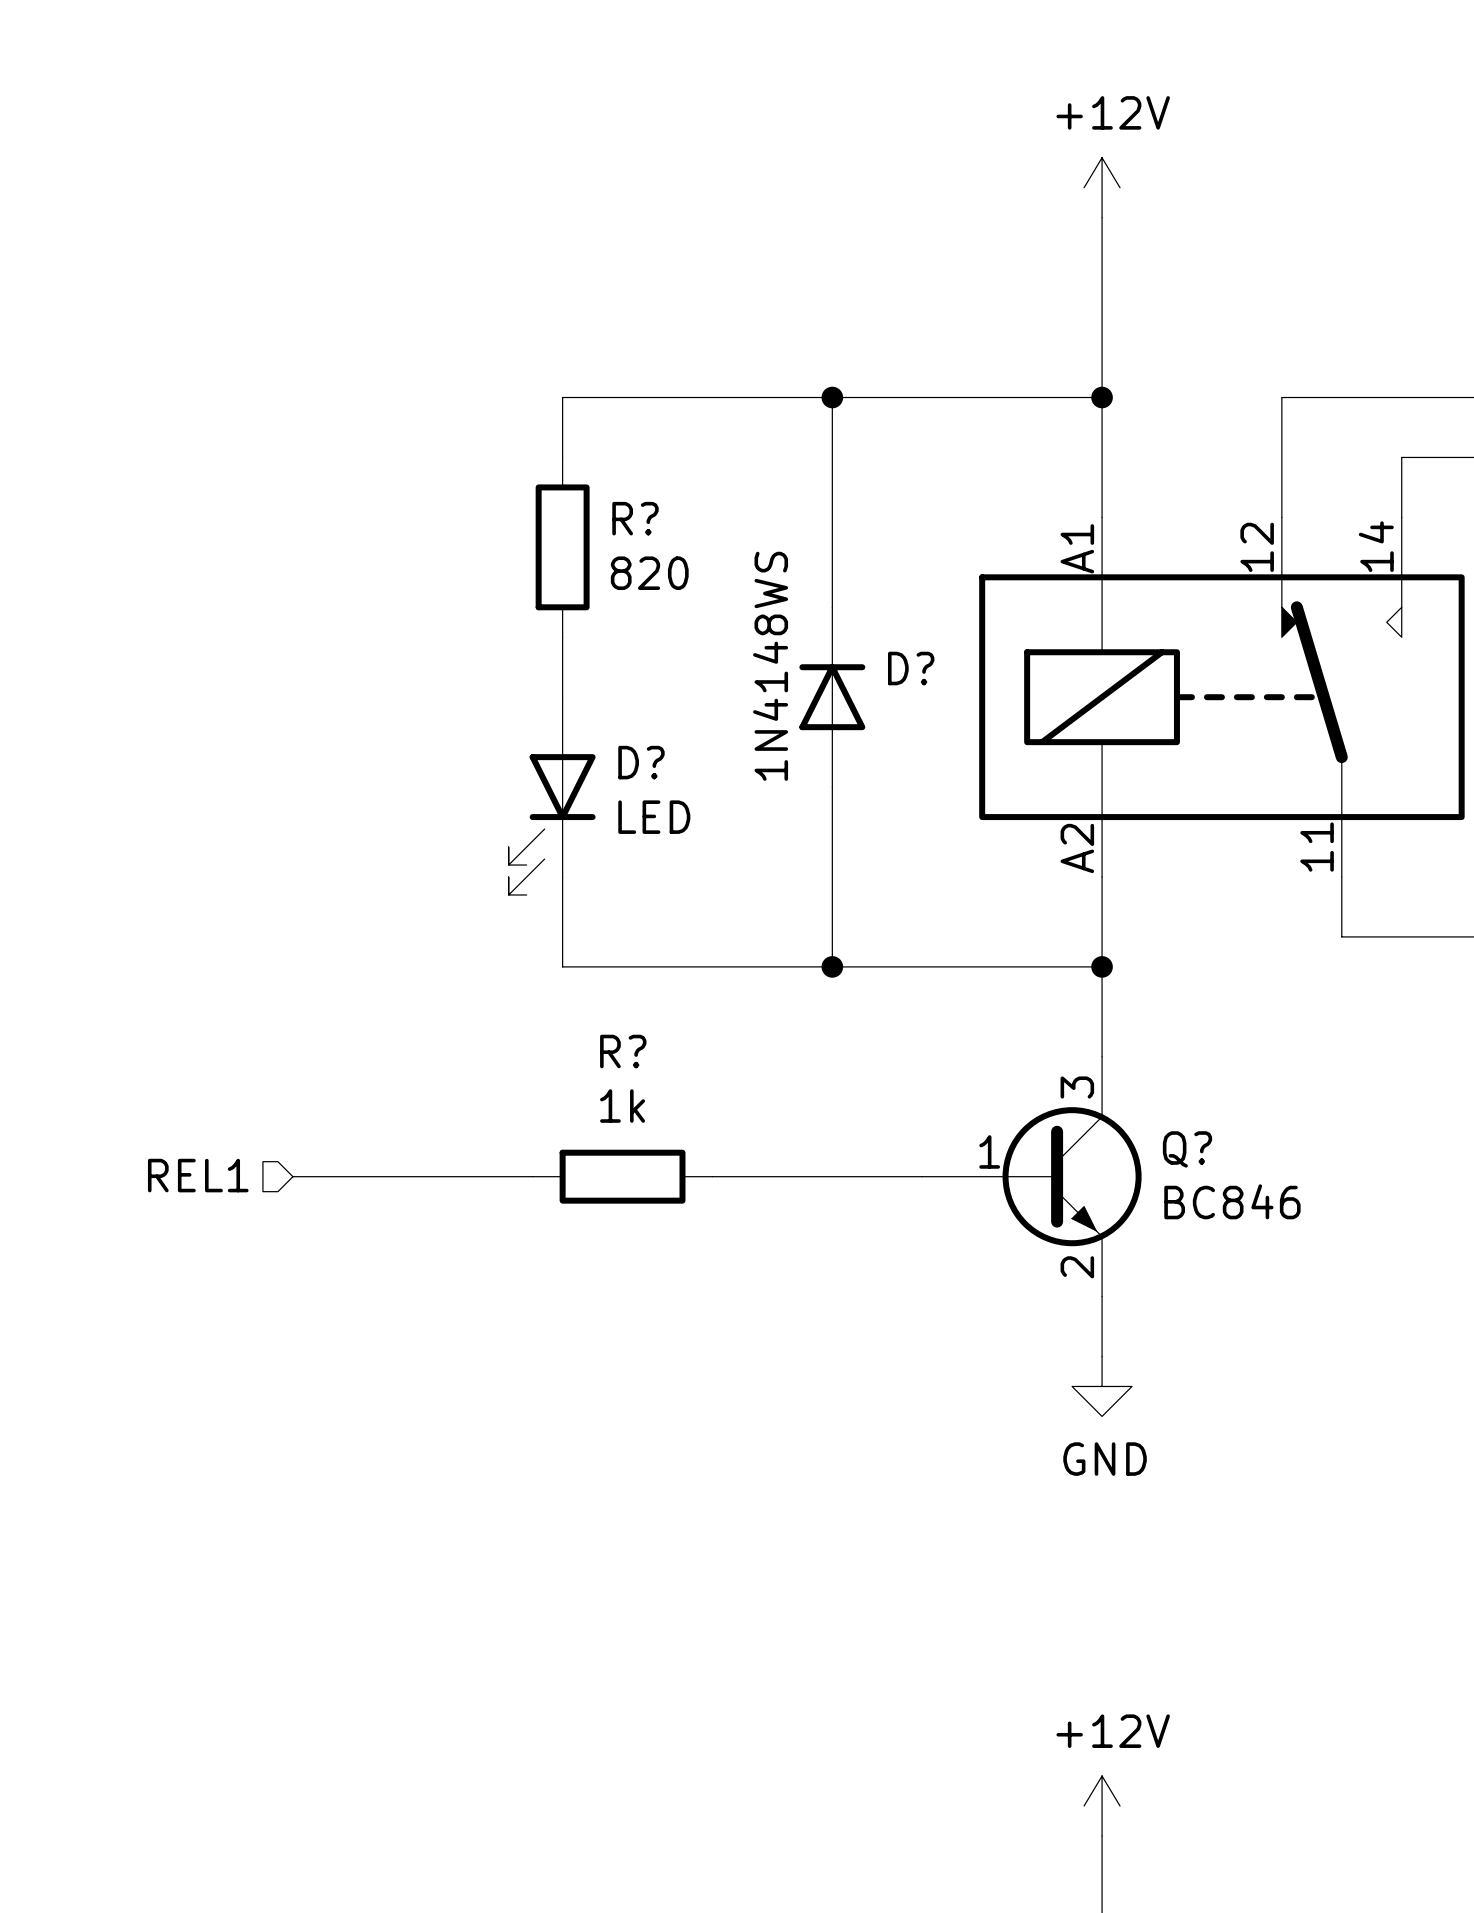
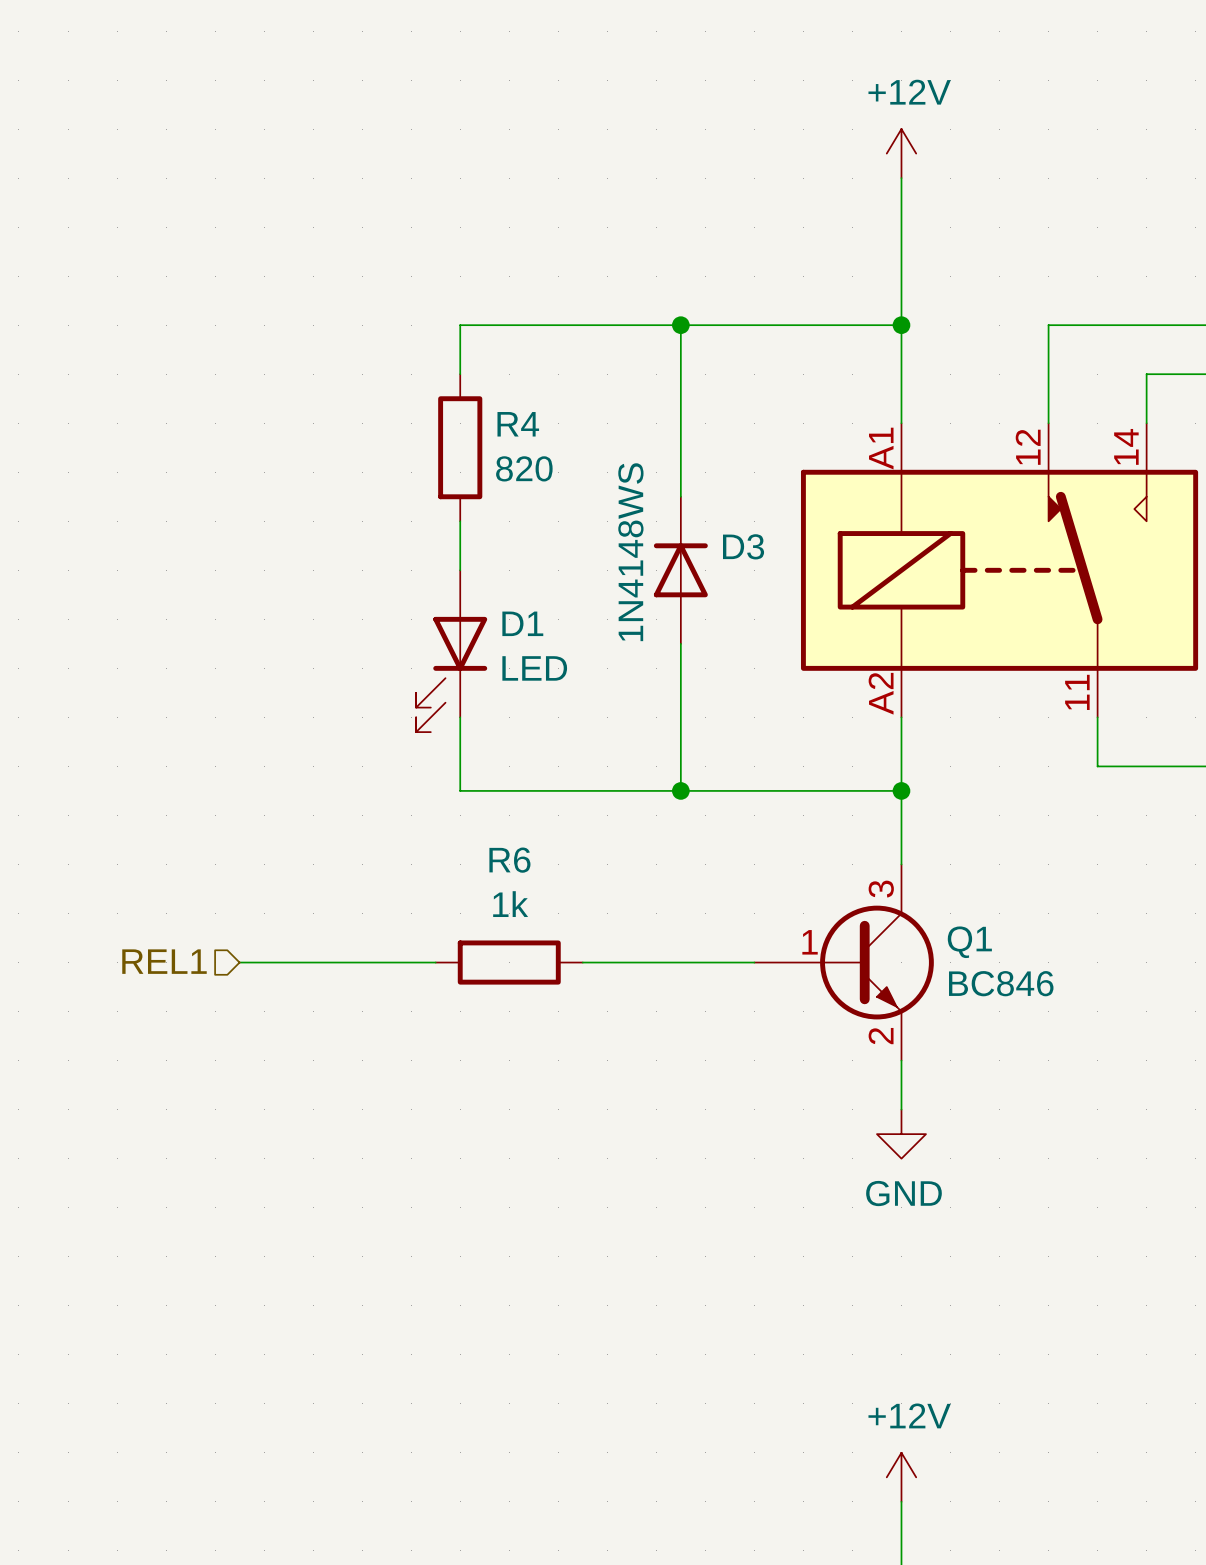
R? name: R? (635, 518) -> R4 (518, 424)
D? name: D? (911, 668) -> D3 (743, 546)
D? name: D? (641, 762) -> D1 (522, 623)
R? name: R? (623, 1051) -> R6 (509, 860)
Q? name: Q? (1187, 1149) -> Q1 (969, 942)

